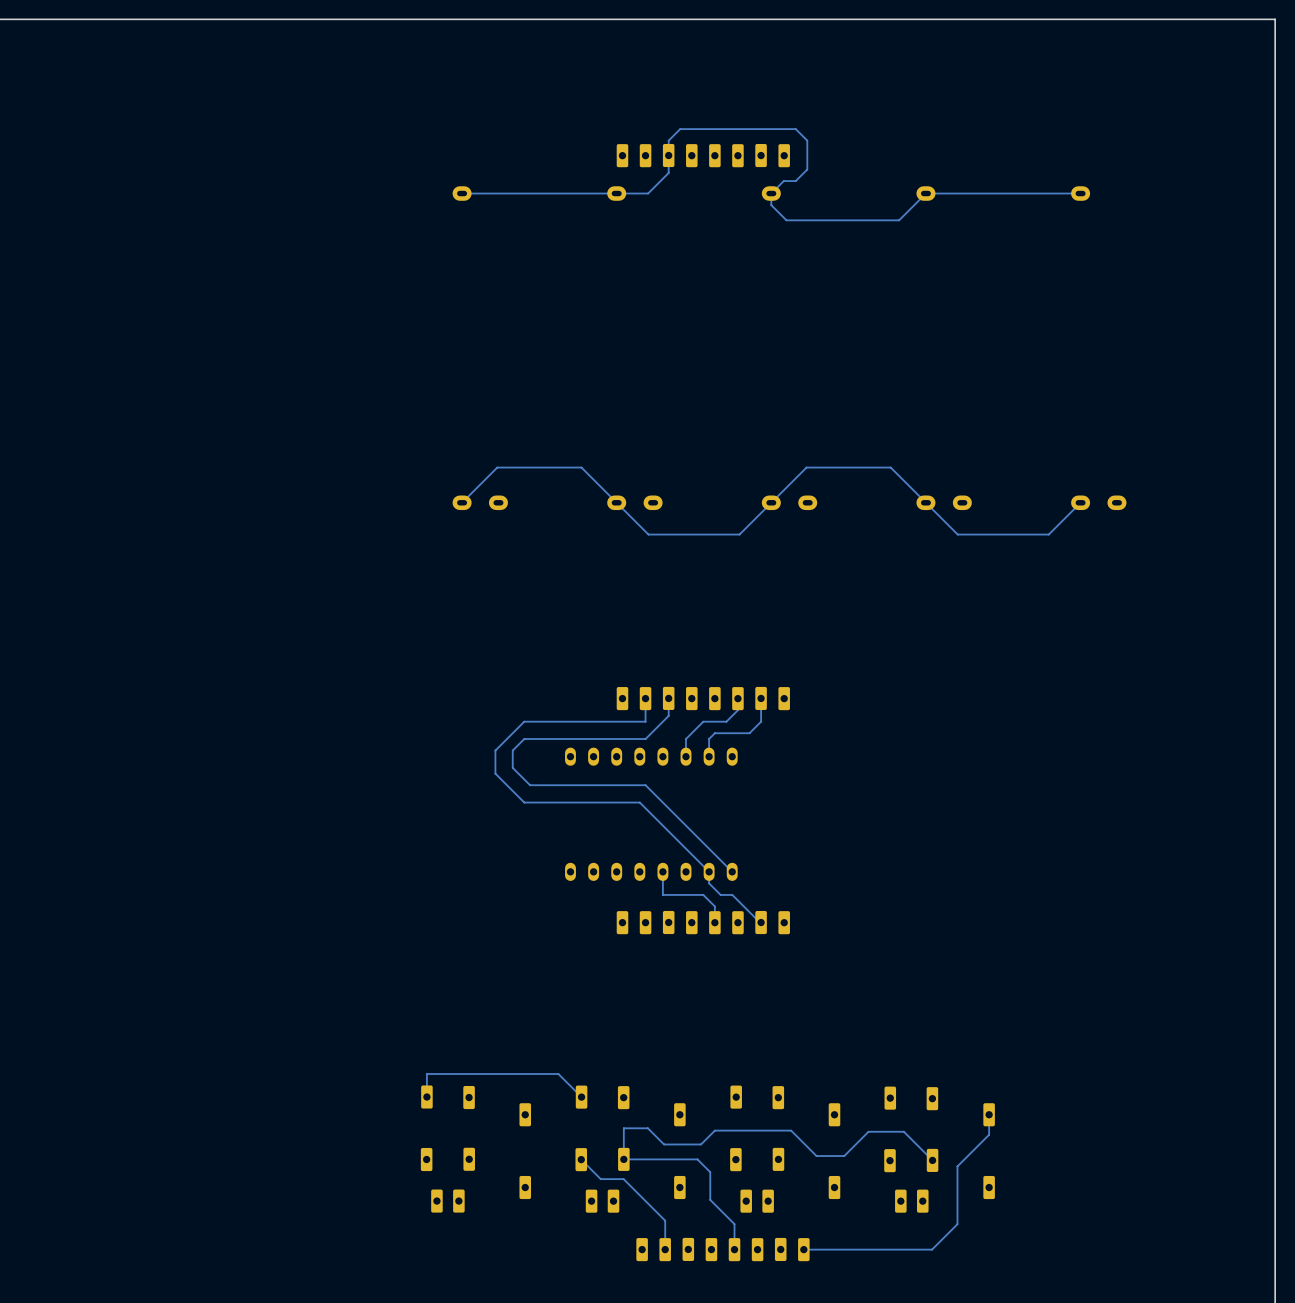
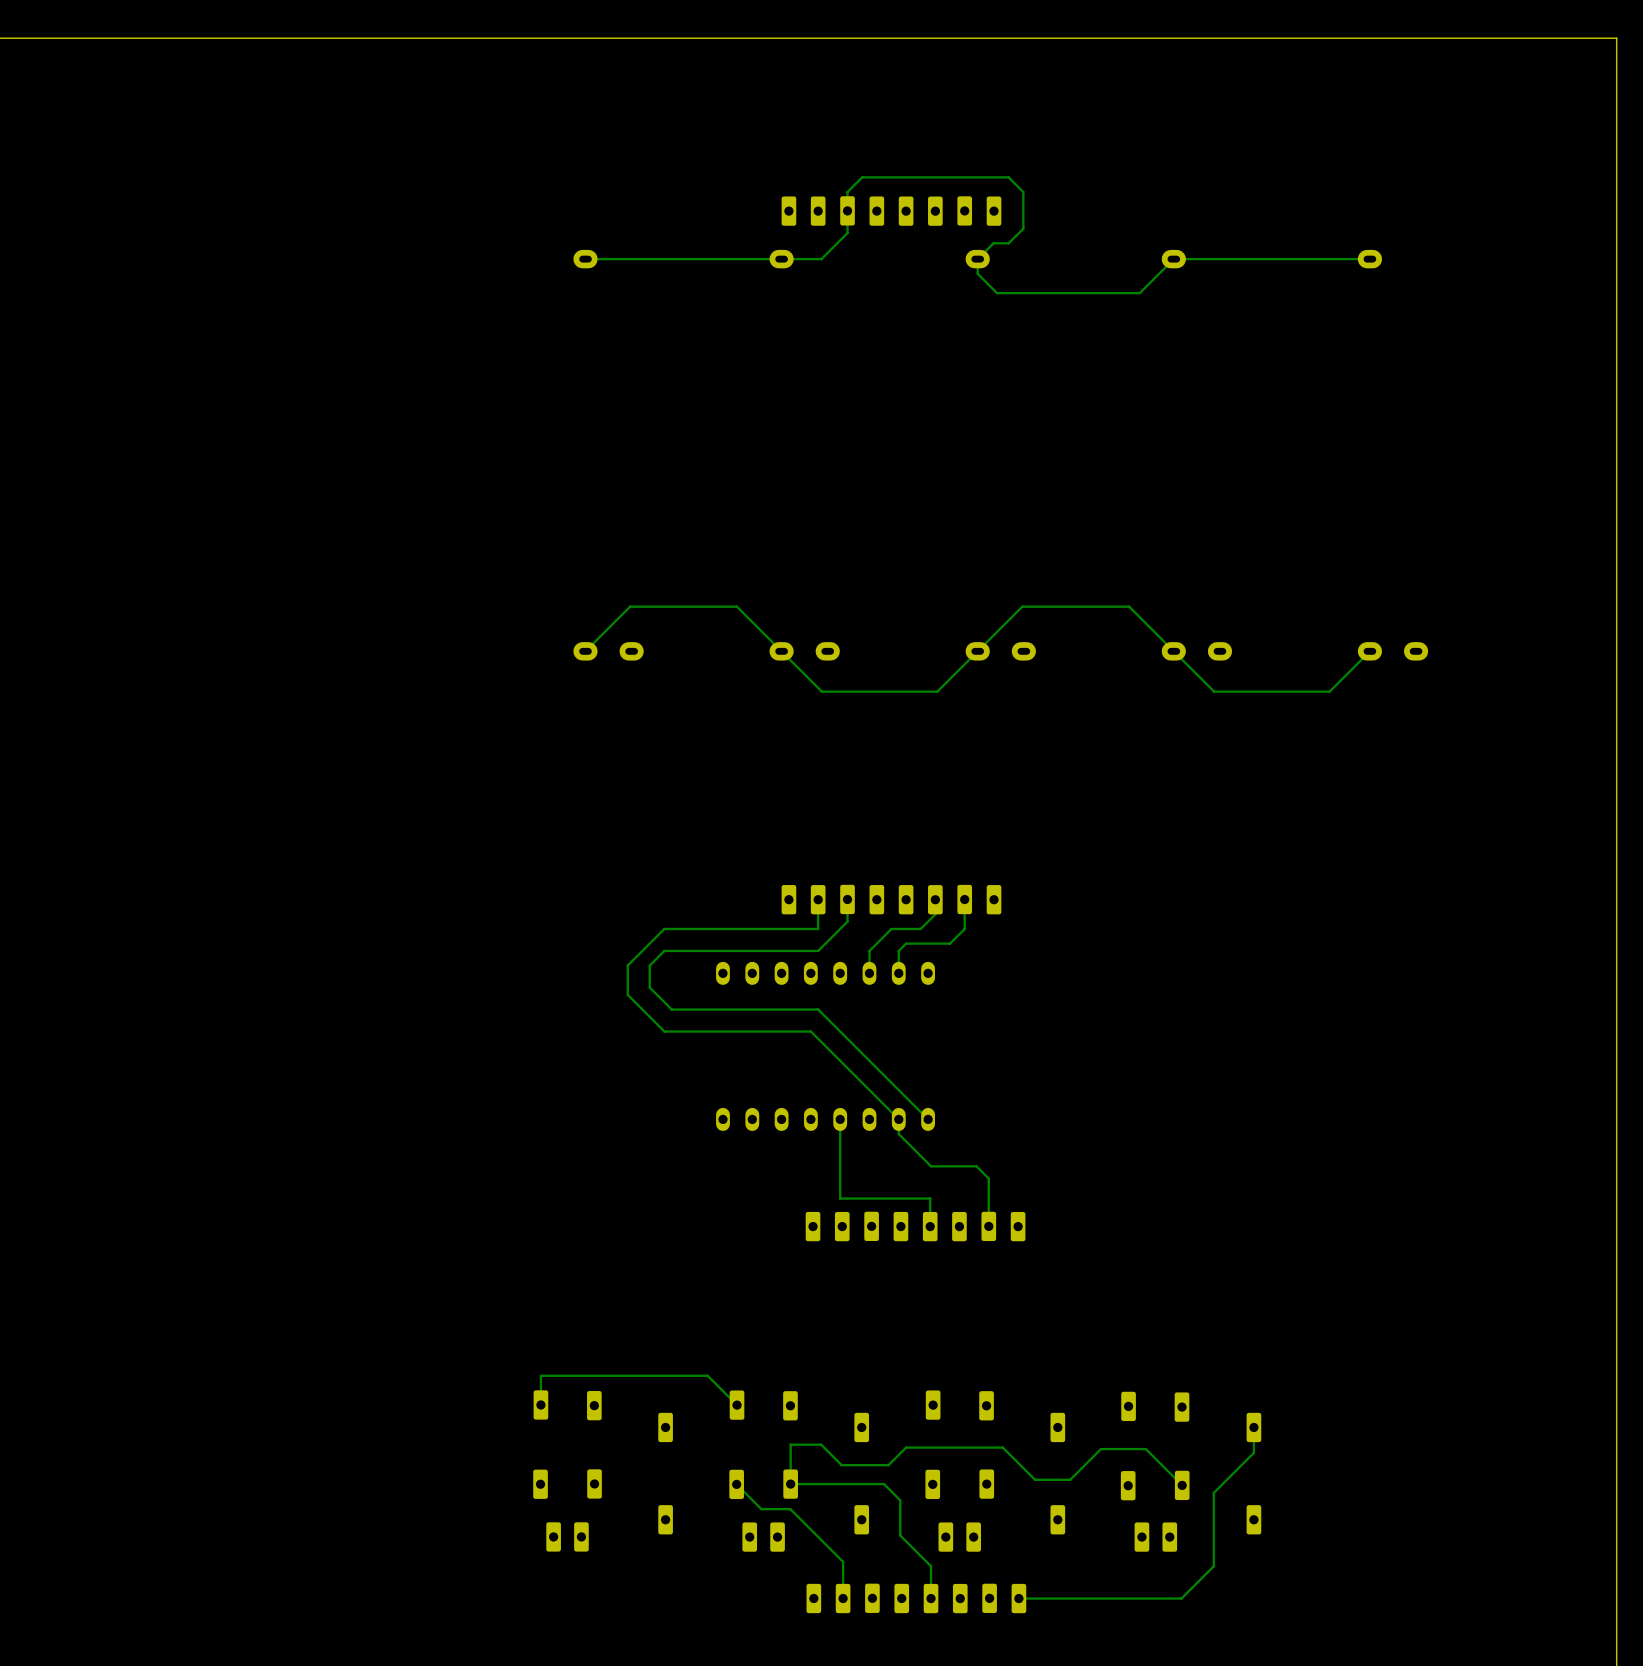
track: (662, 894) (703, 894) (714, 906) (714, 922) -> (840, 1148) (840, 1198) (930, 1198) (930, 1226)
track: (720, 894) (732, 894) (761, 923) -> (913, 1148) (931, 1166) (976, 1166) (988, 1178) (988, 1226)
part position: (703, 922) -> (915, 1226)

